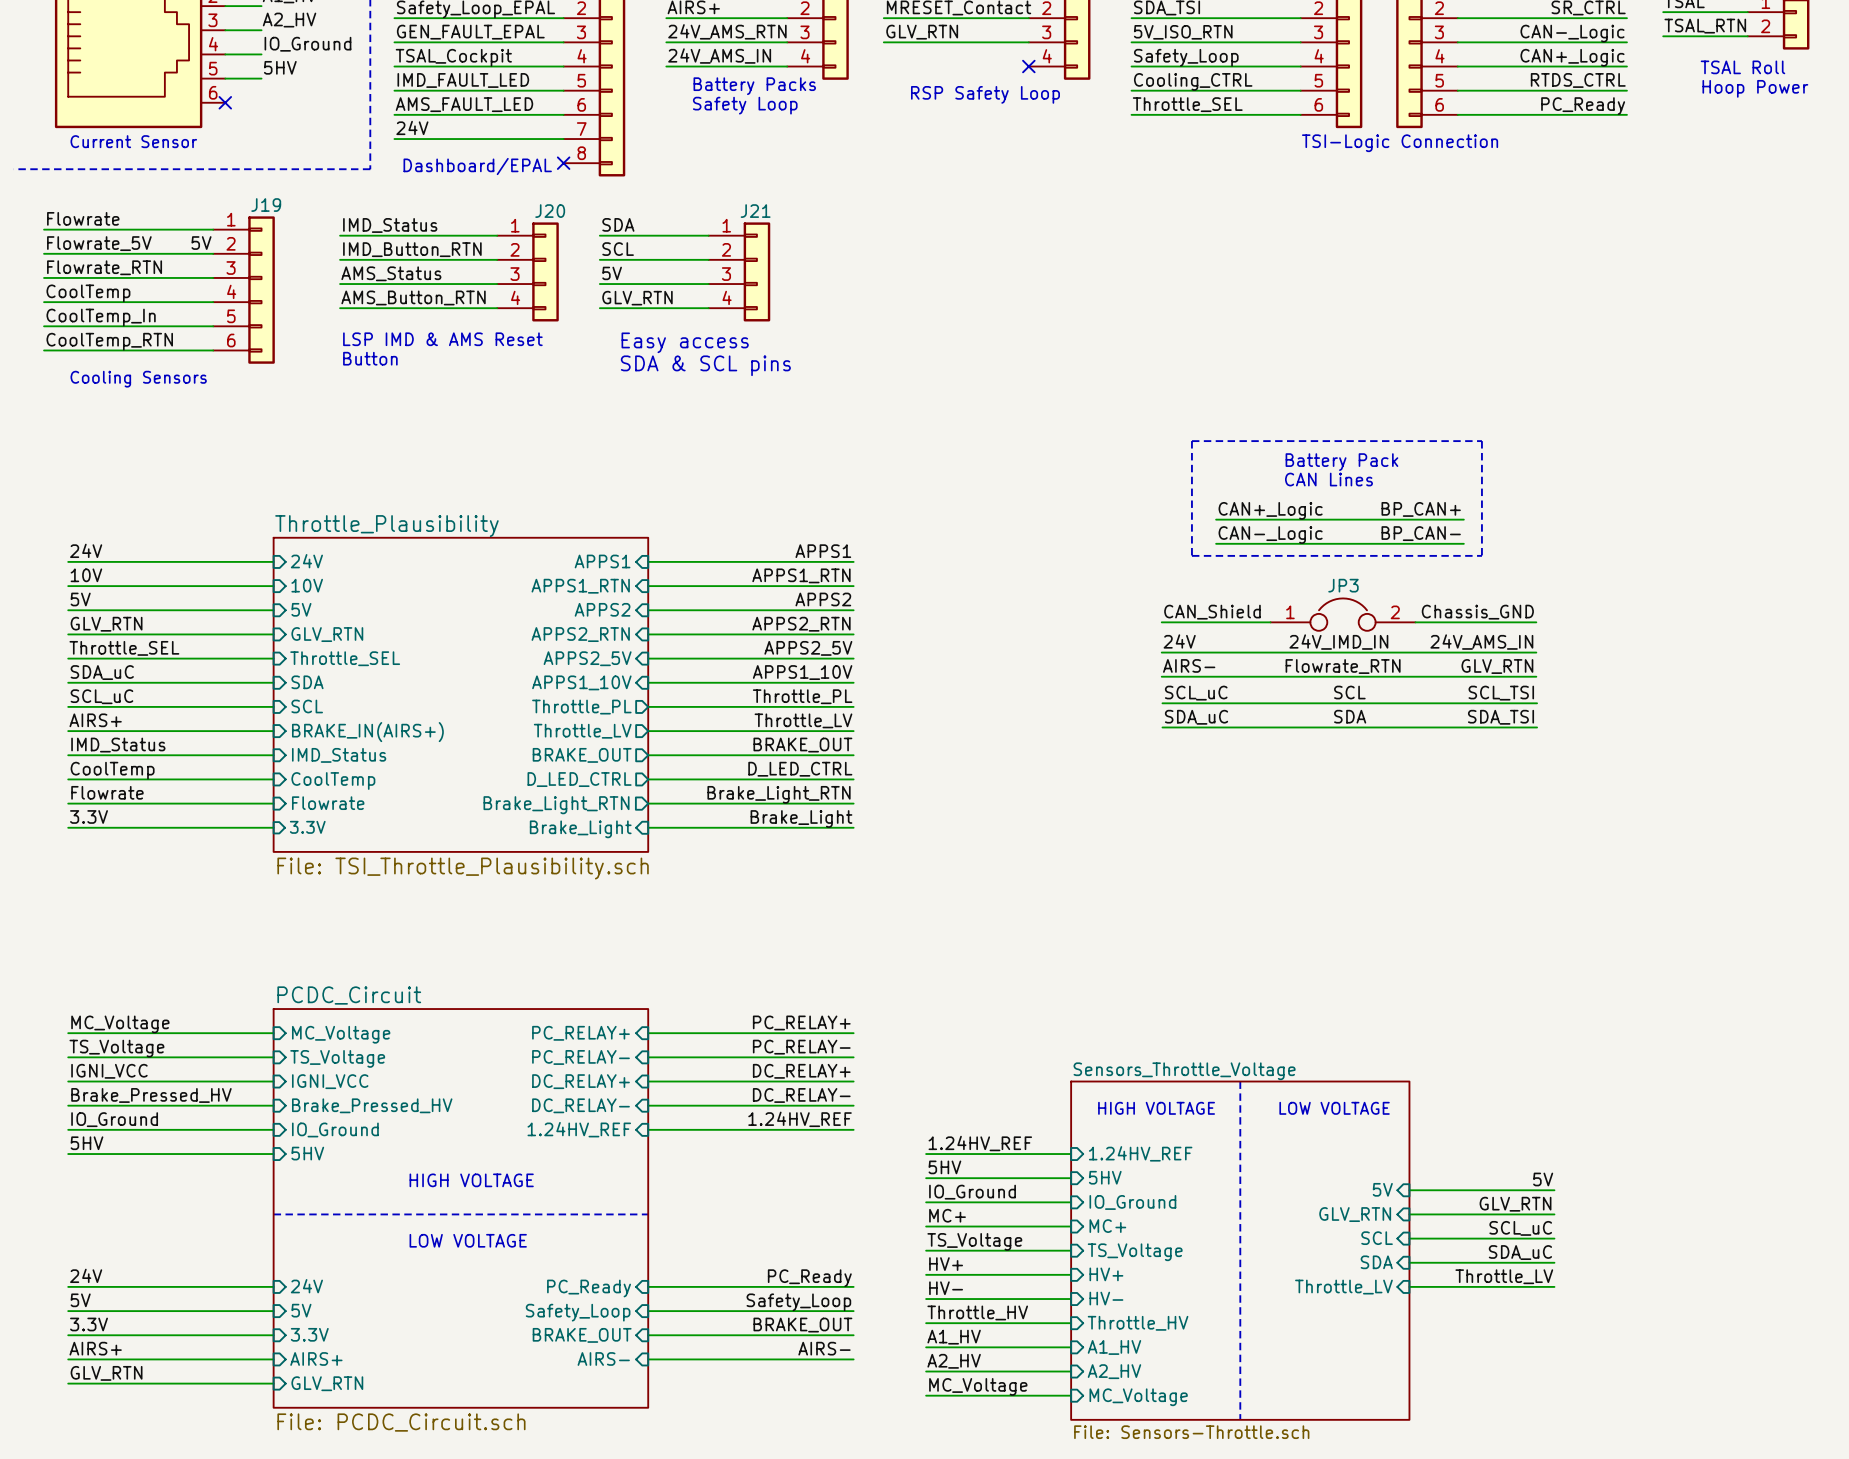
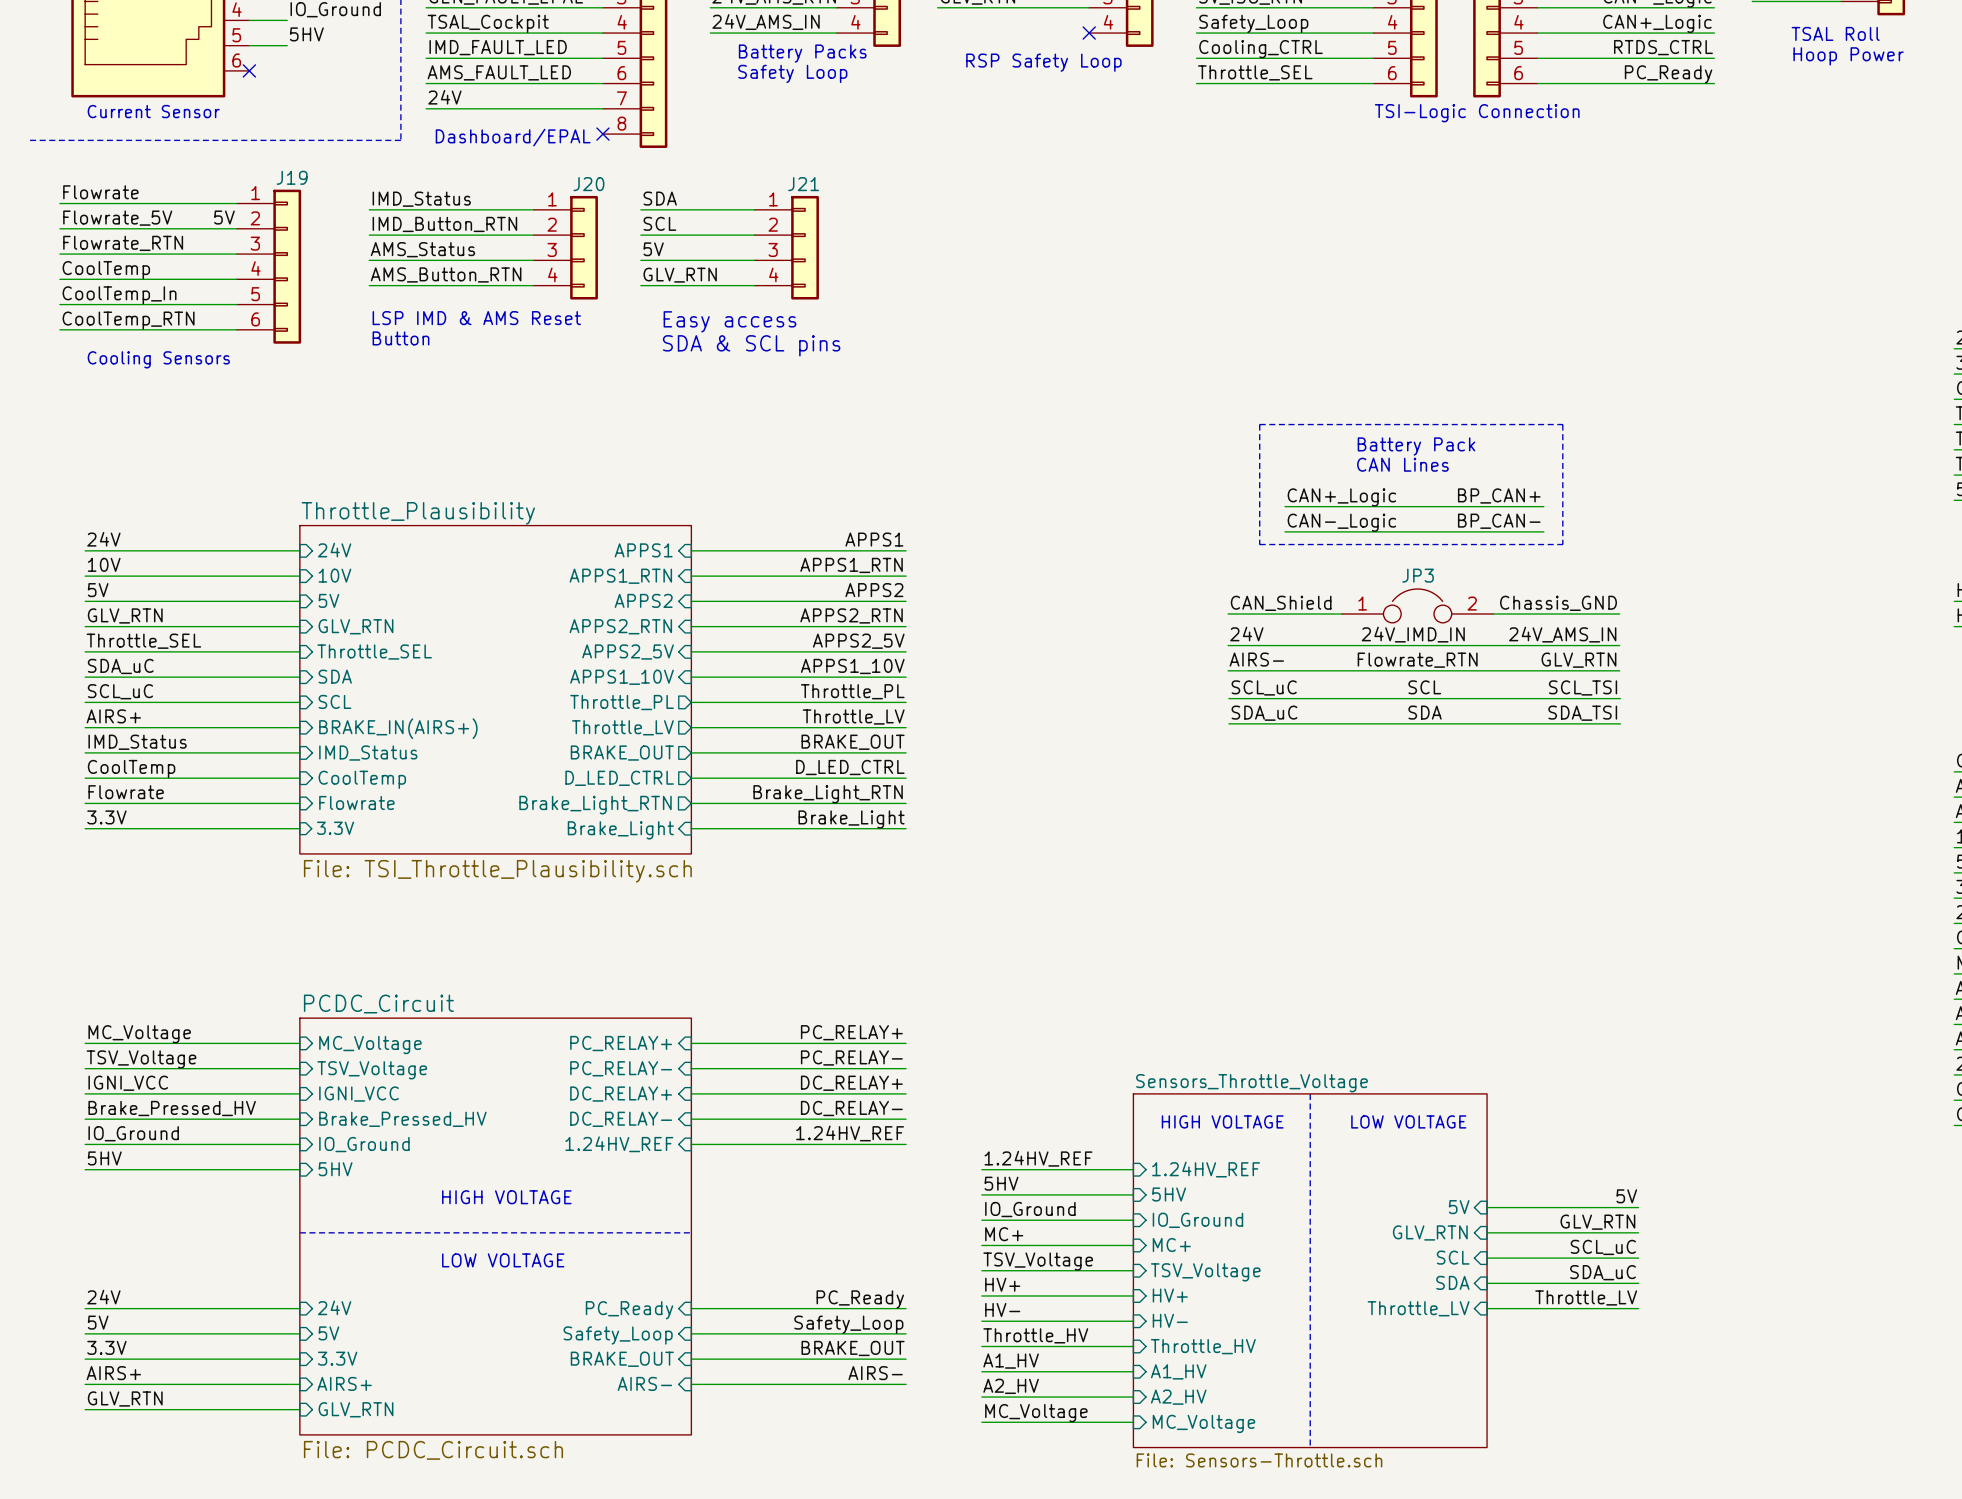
label: TS_Voltage (116, 1048) -> TSV_Voltage (141, 1059)
sheet pin: TS_Voltage (337, 1058) -> TSV_Voltage (372, 1070)
label: TS_Voltage (974, 1241) -> TSV_Voltage (1038, 1261)
sheet pin: TS_Voltage (1135, 1252) -> TSV_Voltage (1205, 1272)

